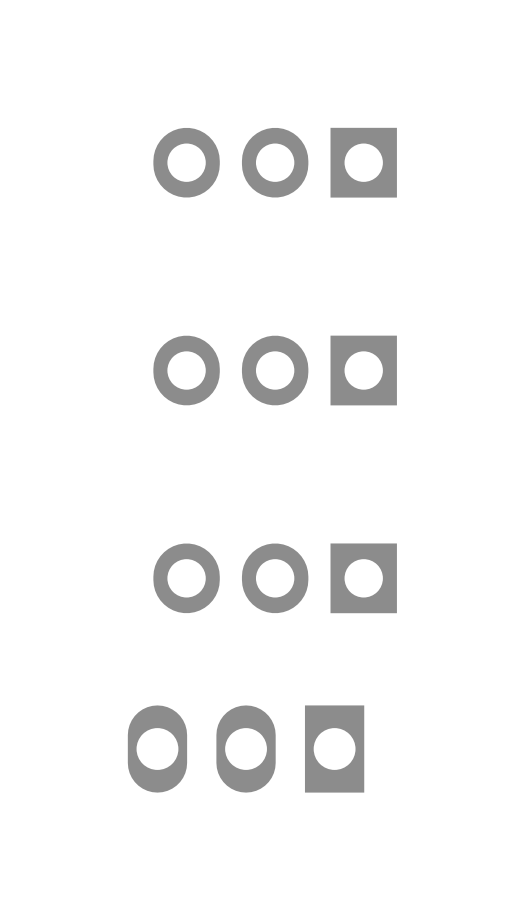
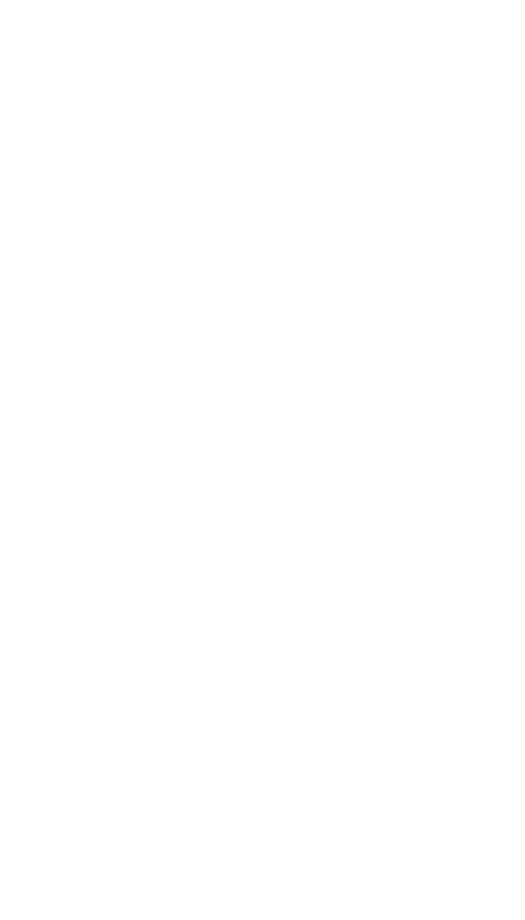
part: (275, 162) -> none
part: (275, 370) -> none
part: (275, 578) -> none
part: (246, 749) -> none

